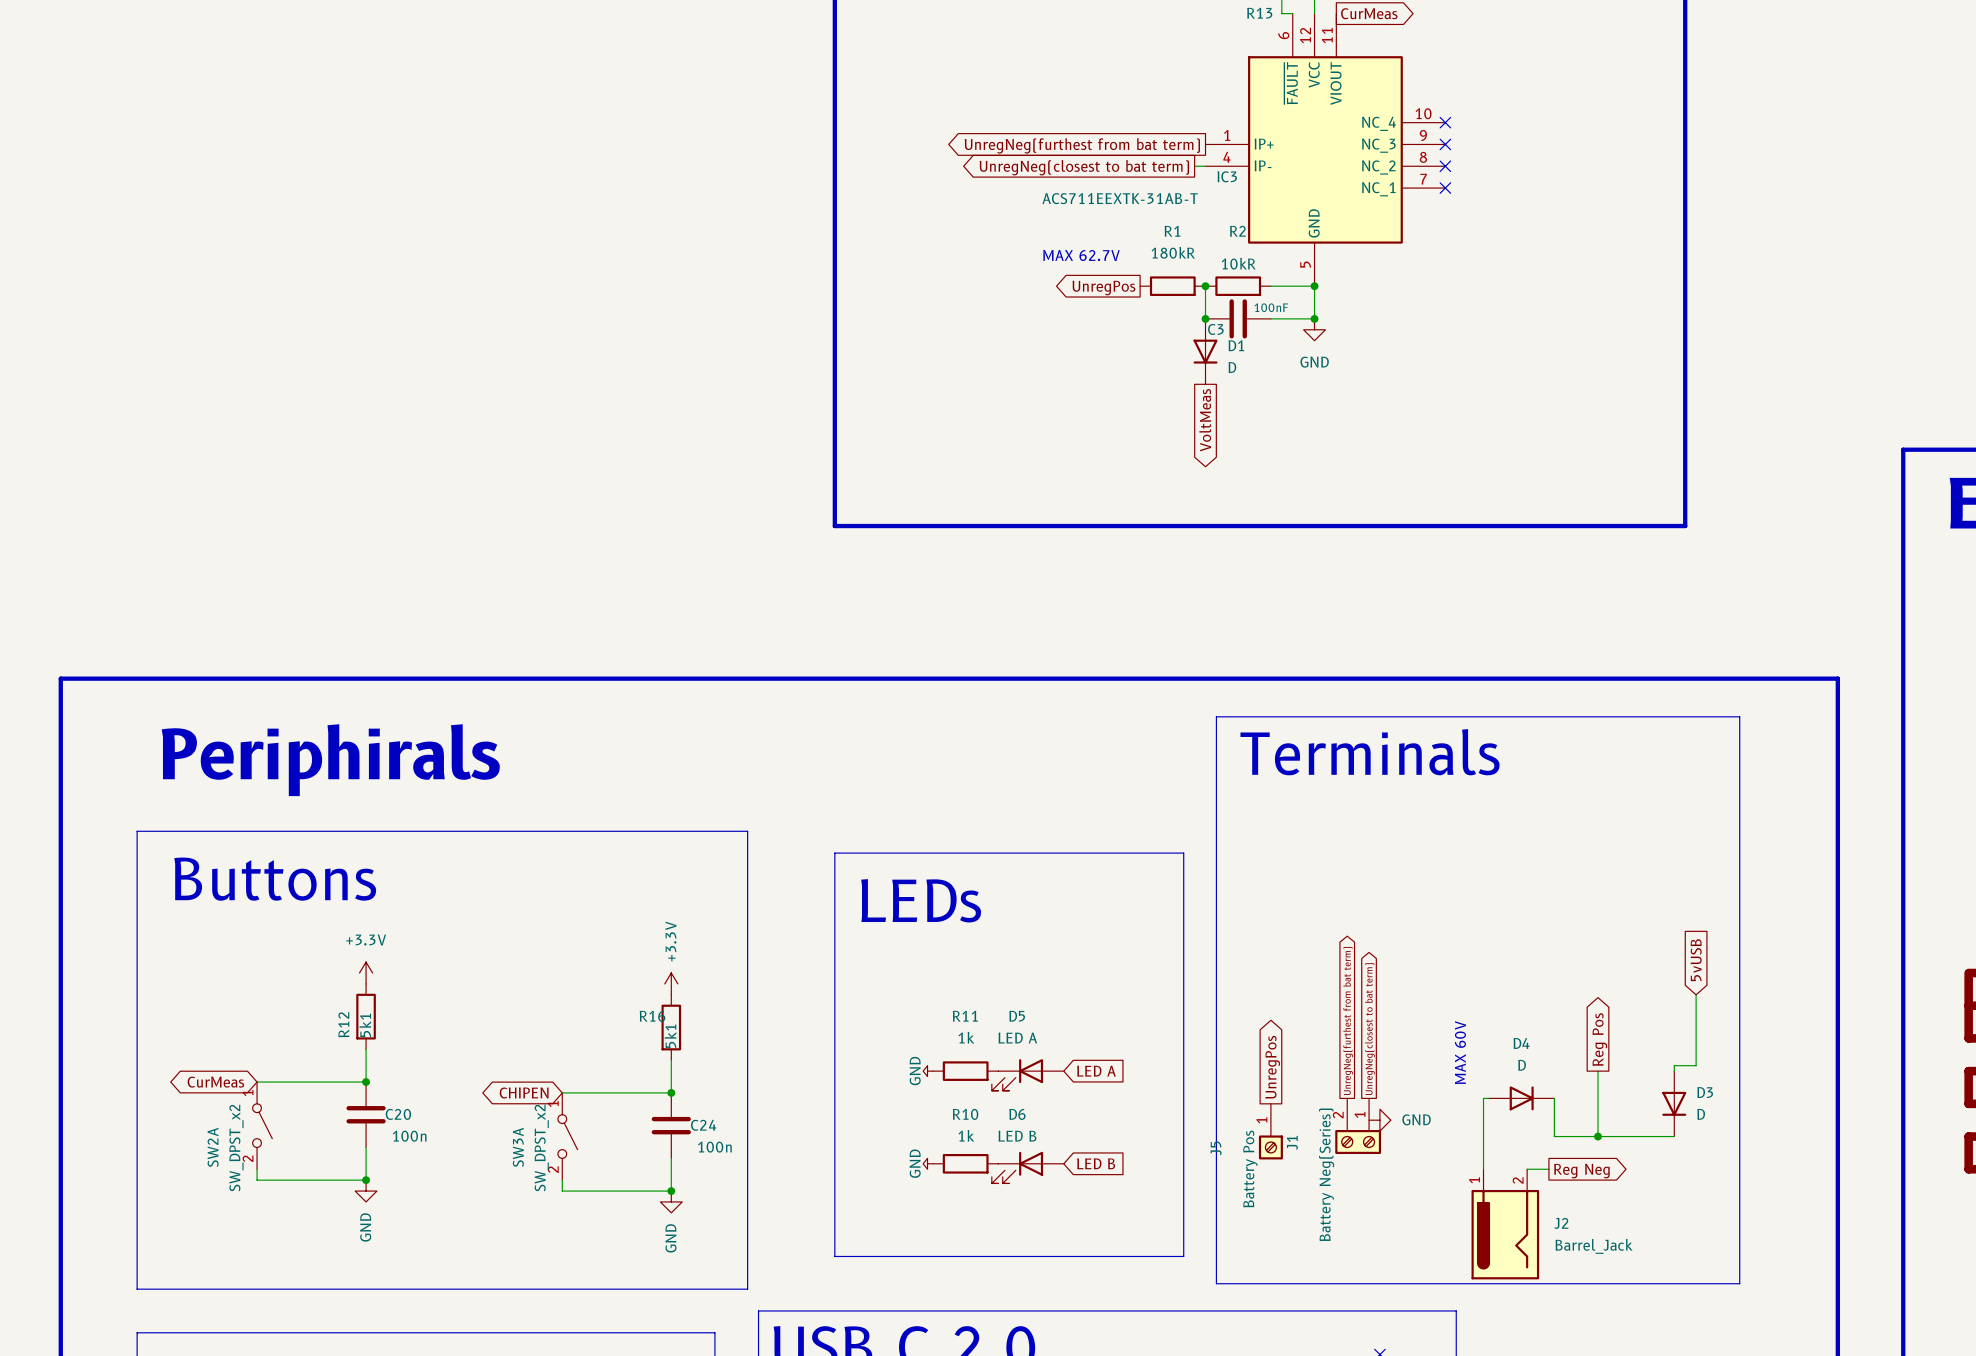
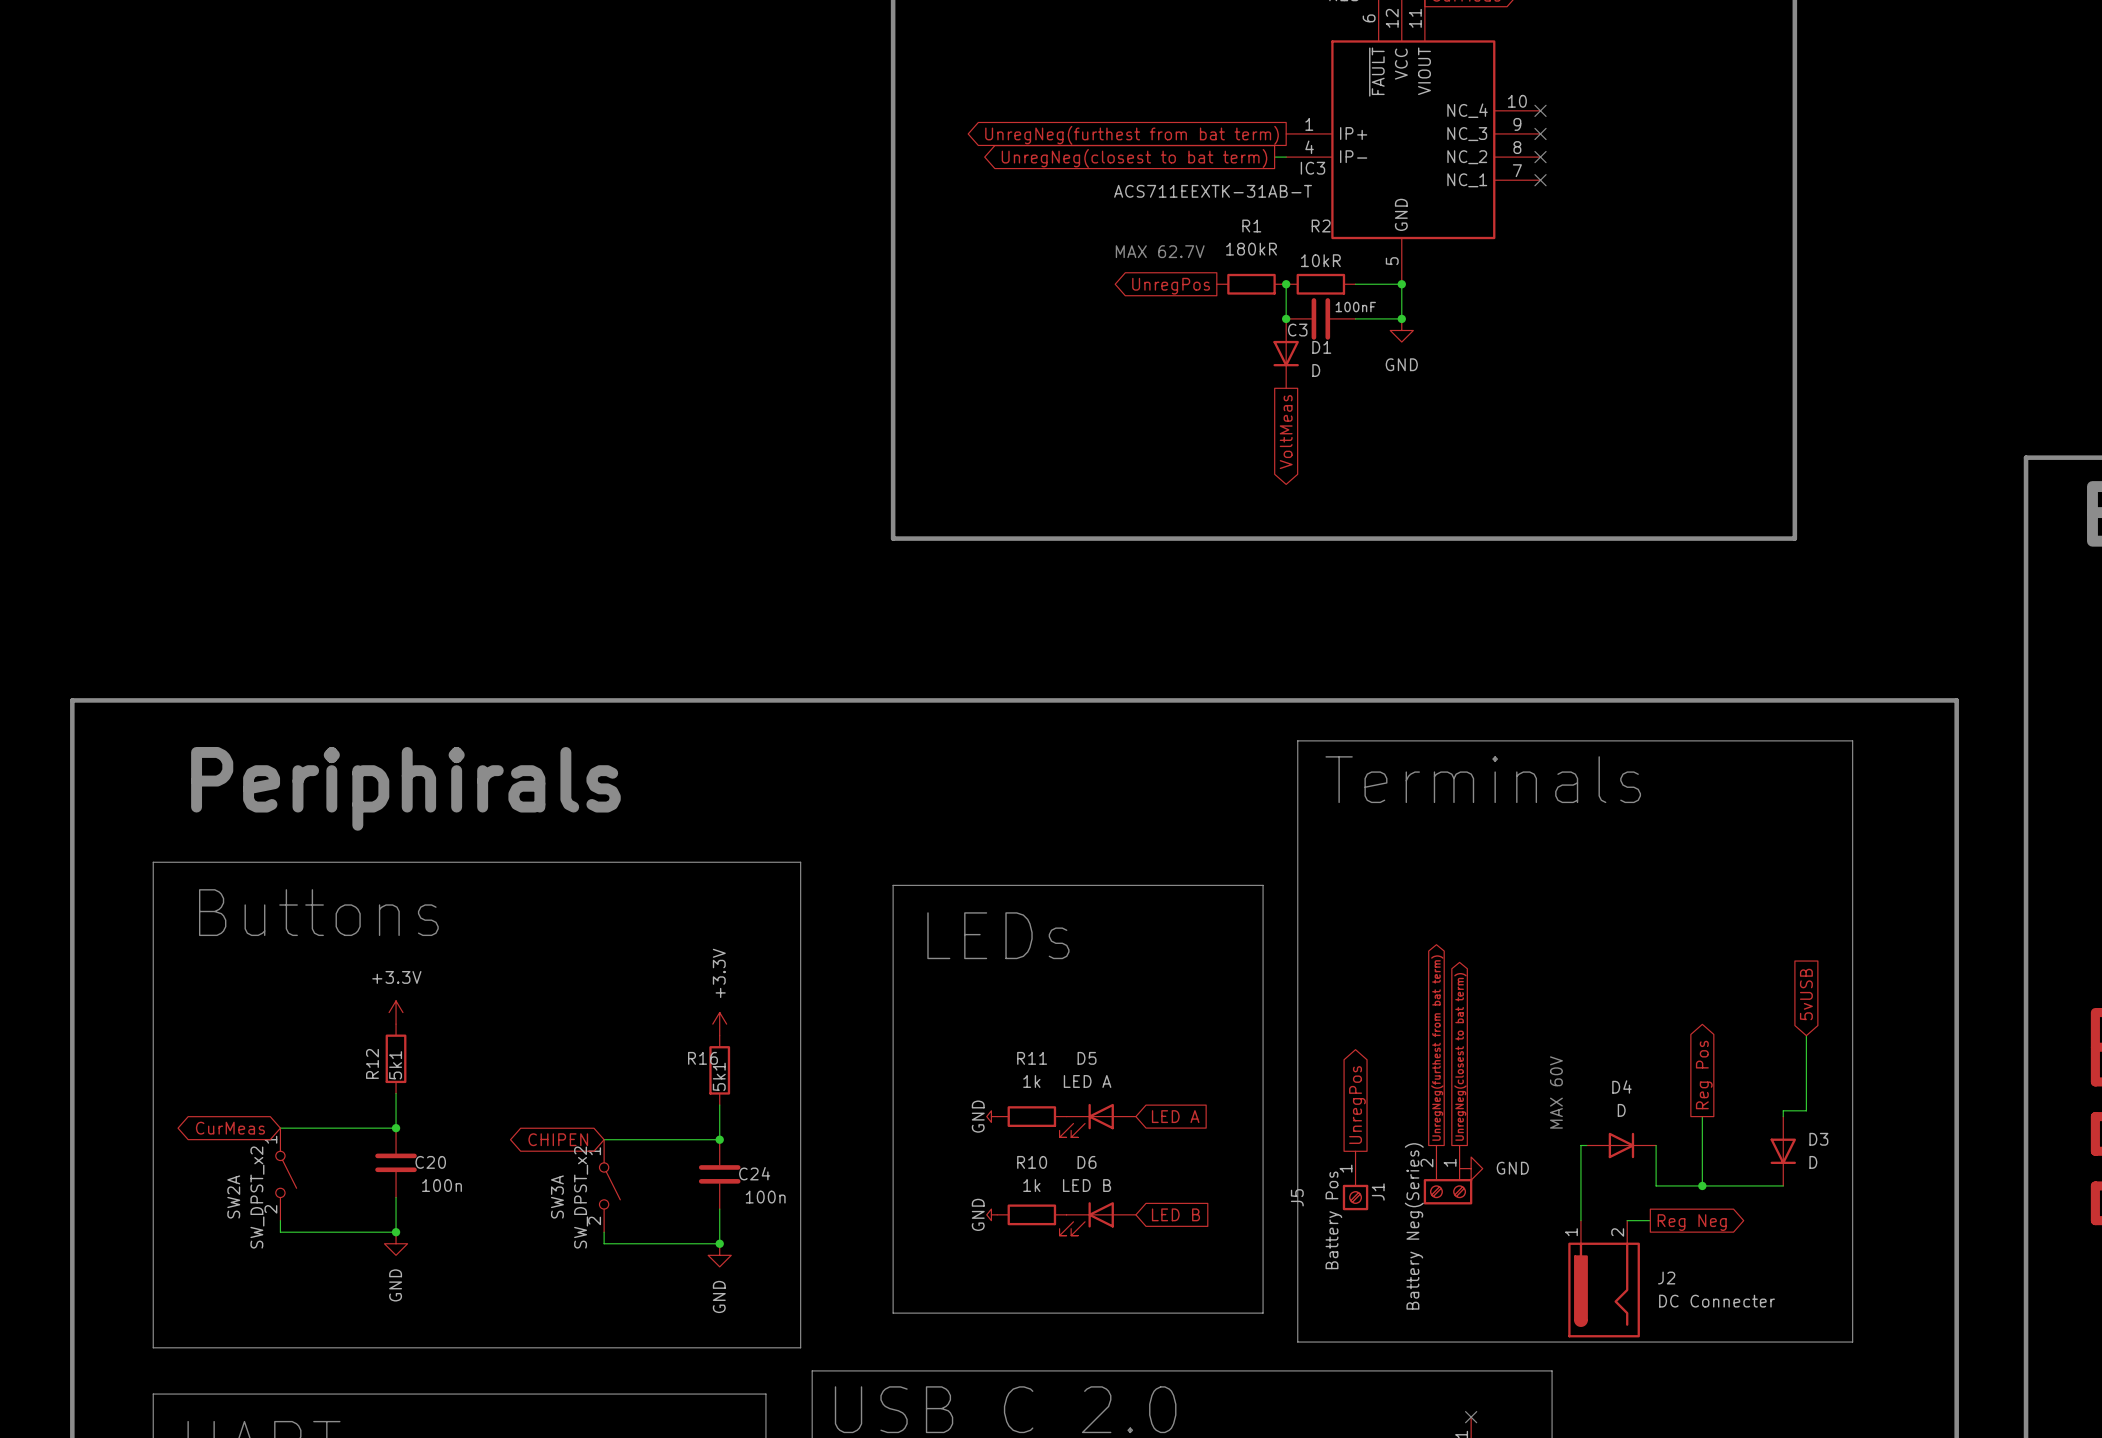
J2 value: Barrel_Jack (1594, 1246) -> DC Connecter (1717, 1301)

